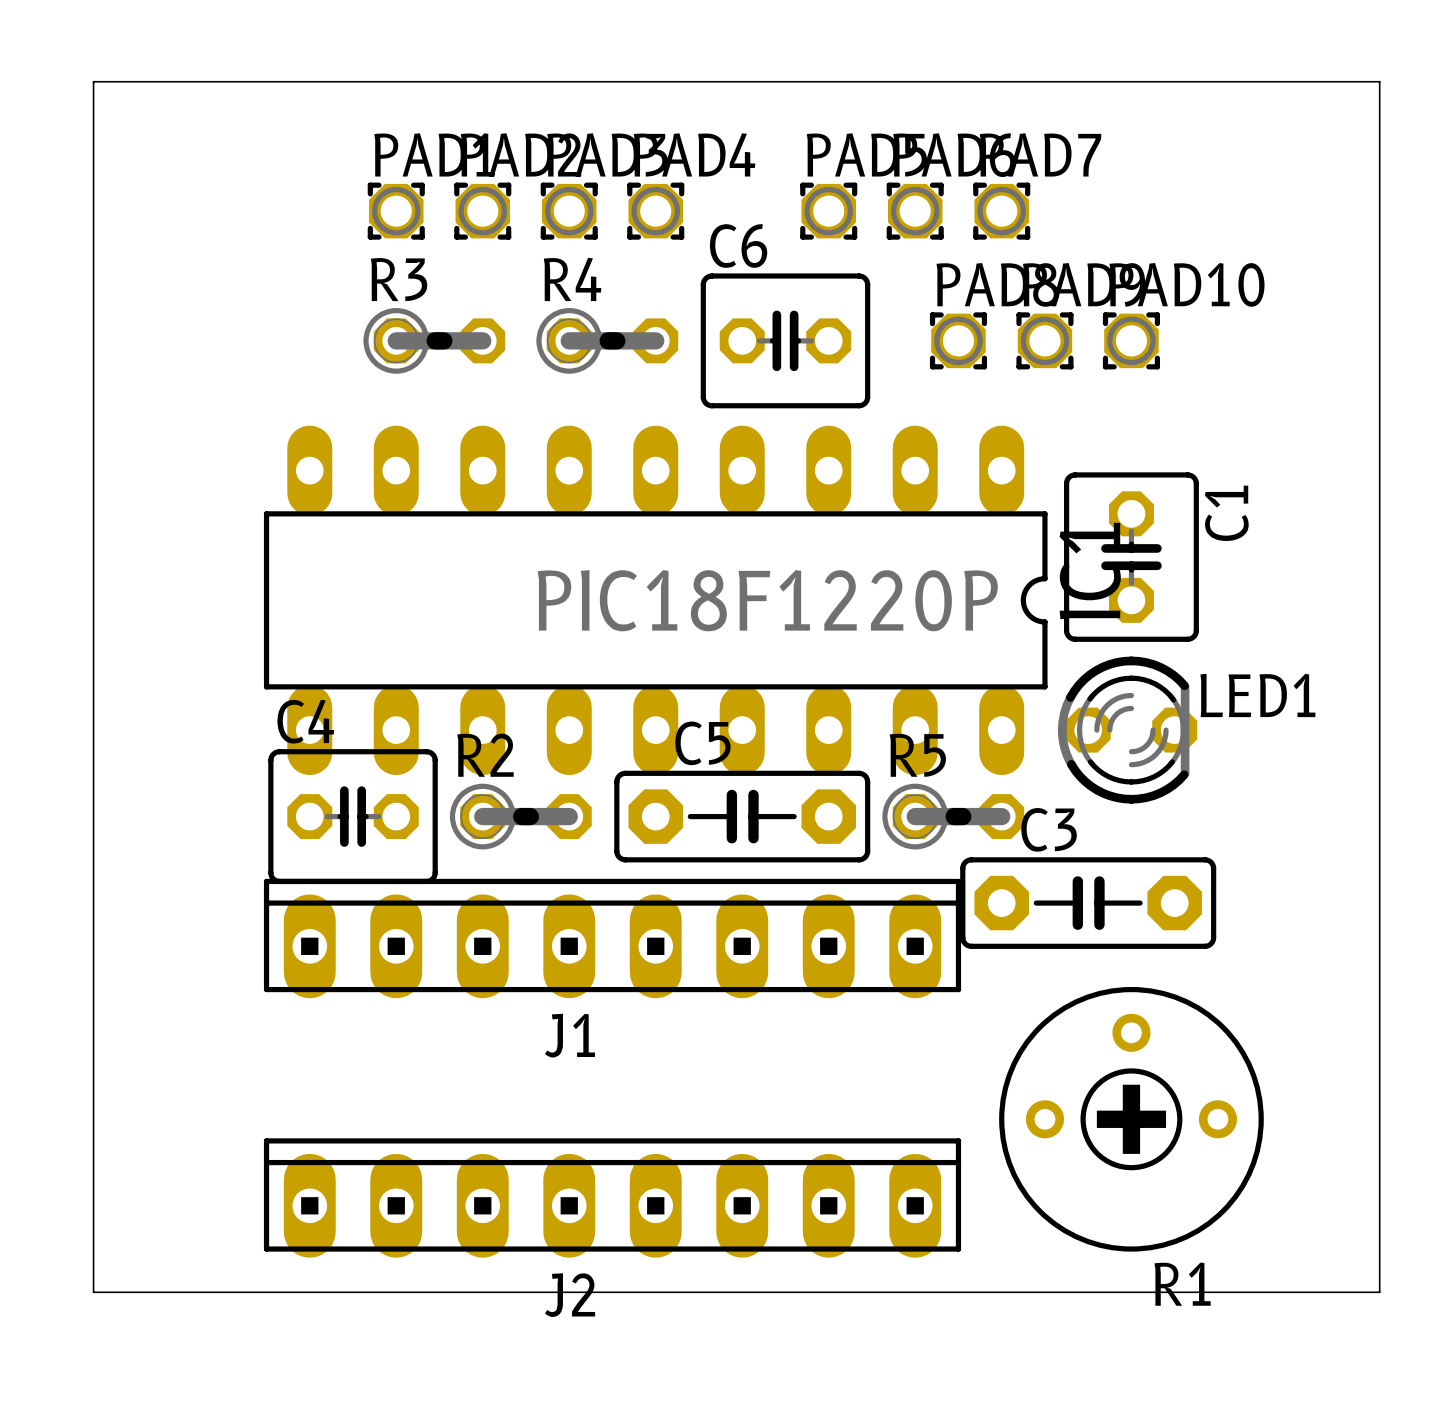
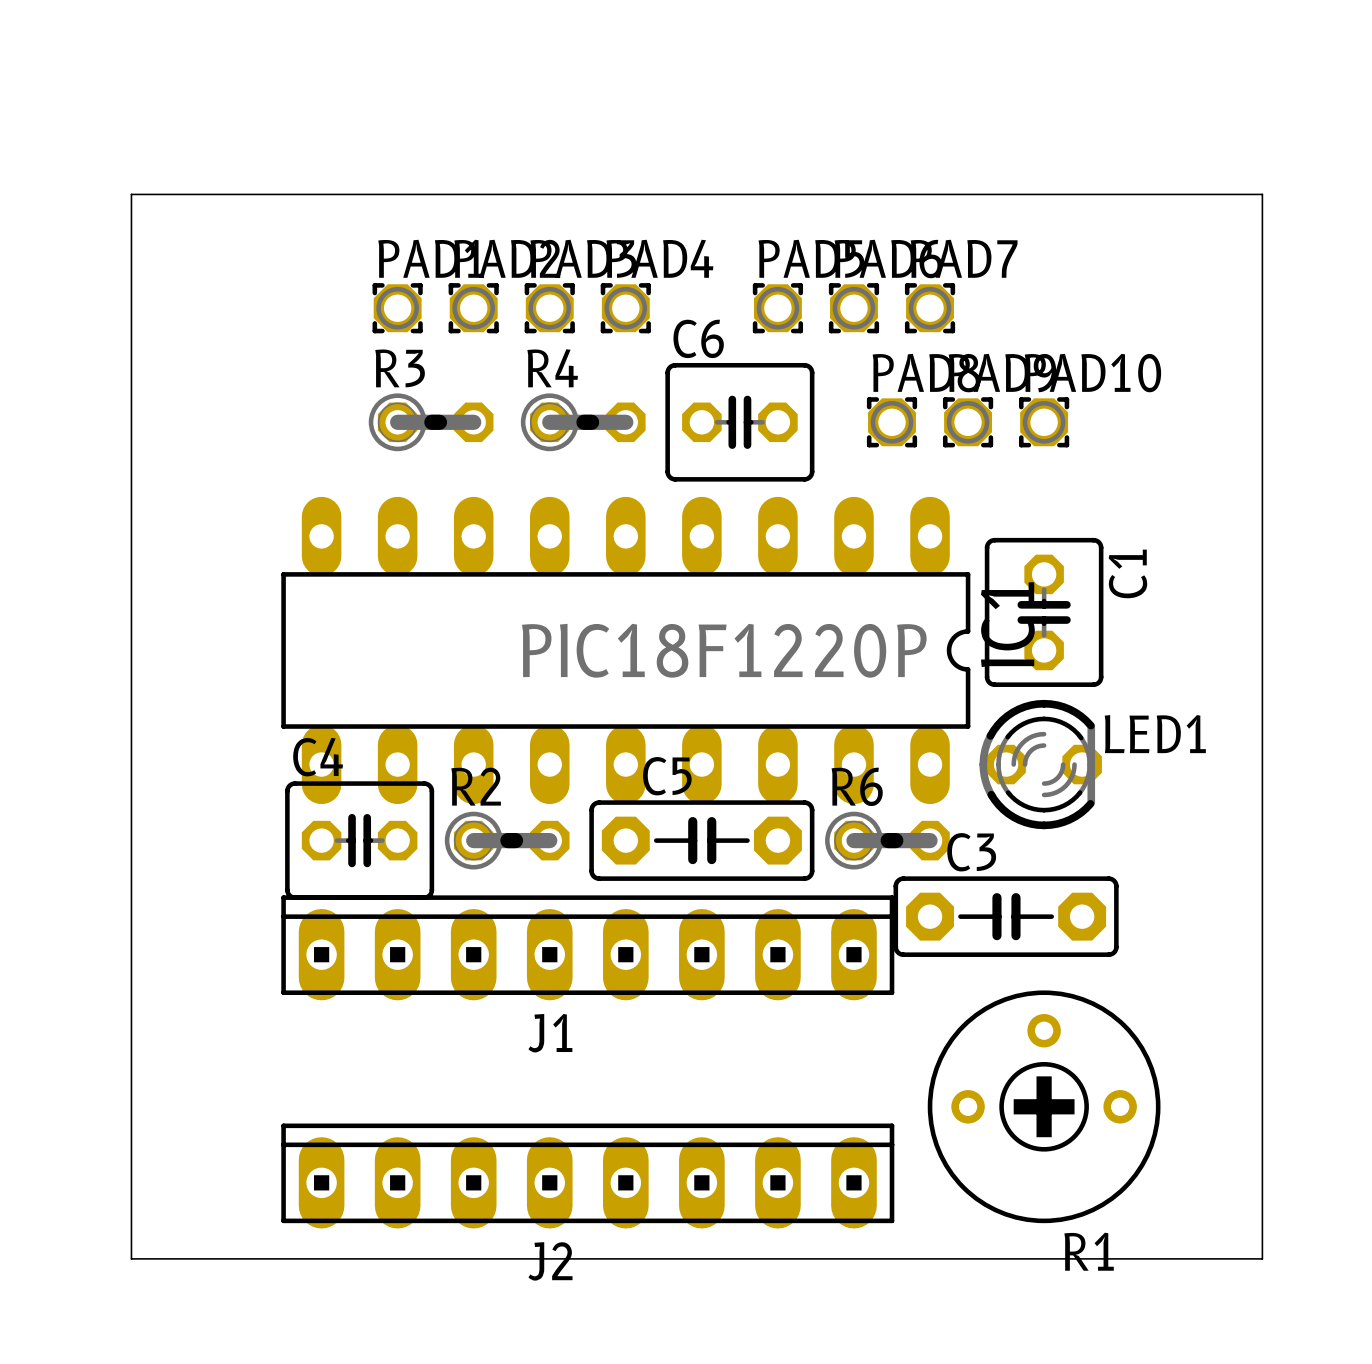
R5 name: R5 (917, 755) -> R6 (857, 786)

